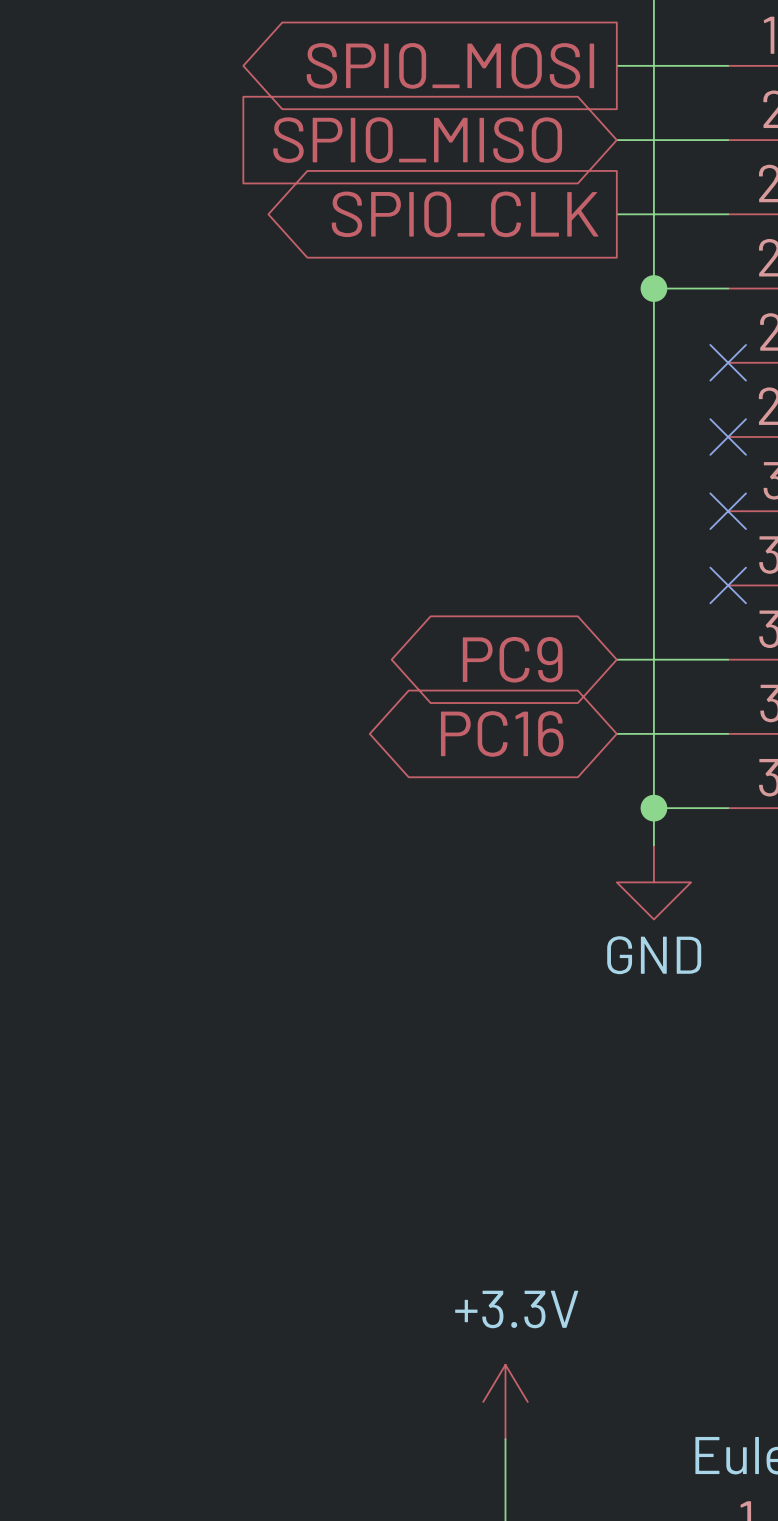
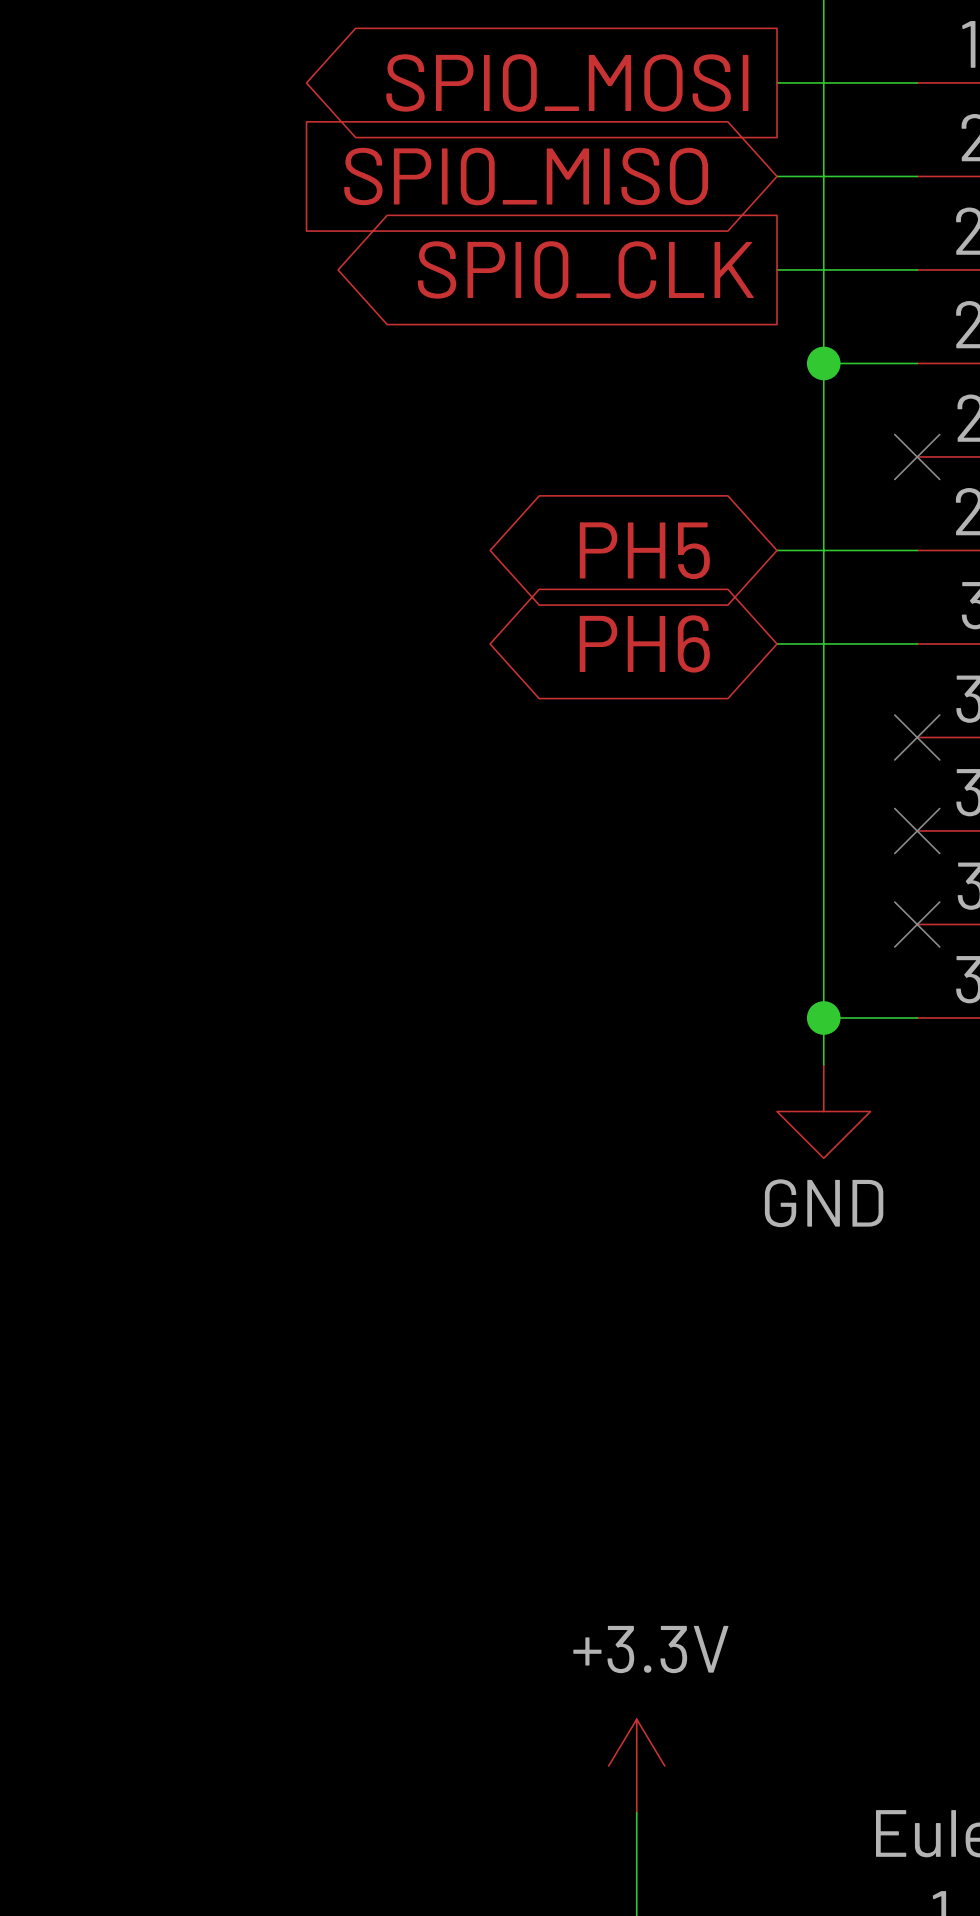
global label: none -> PH5 (644, 550)
no-connect mark: (728, 437) -> none
global label: none -> PH6 (644, 643)
no-connect mark: (728, 511) -> none
global label: PC9 (512, 659) -> none
wire: (616, 659) (728, 659) -> (777, 643) (917, 643)
no-connect mark: none -> (917, 830)
global label: PC16 (502, 733) -> none
wire: (616, 733) (728, 733) -> (777, 550) (917, 550)
no-connect mark: none -> (917, 924)

